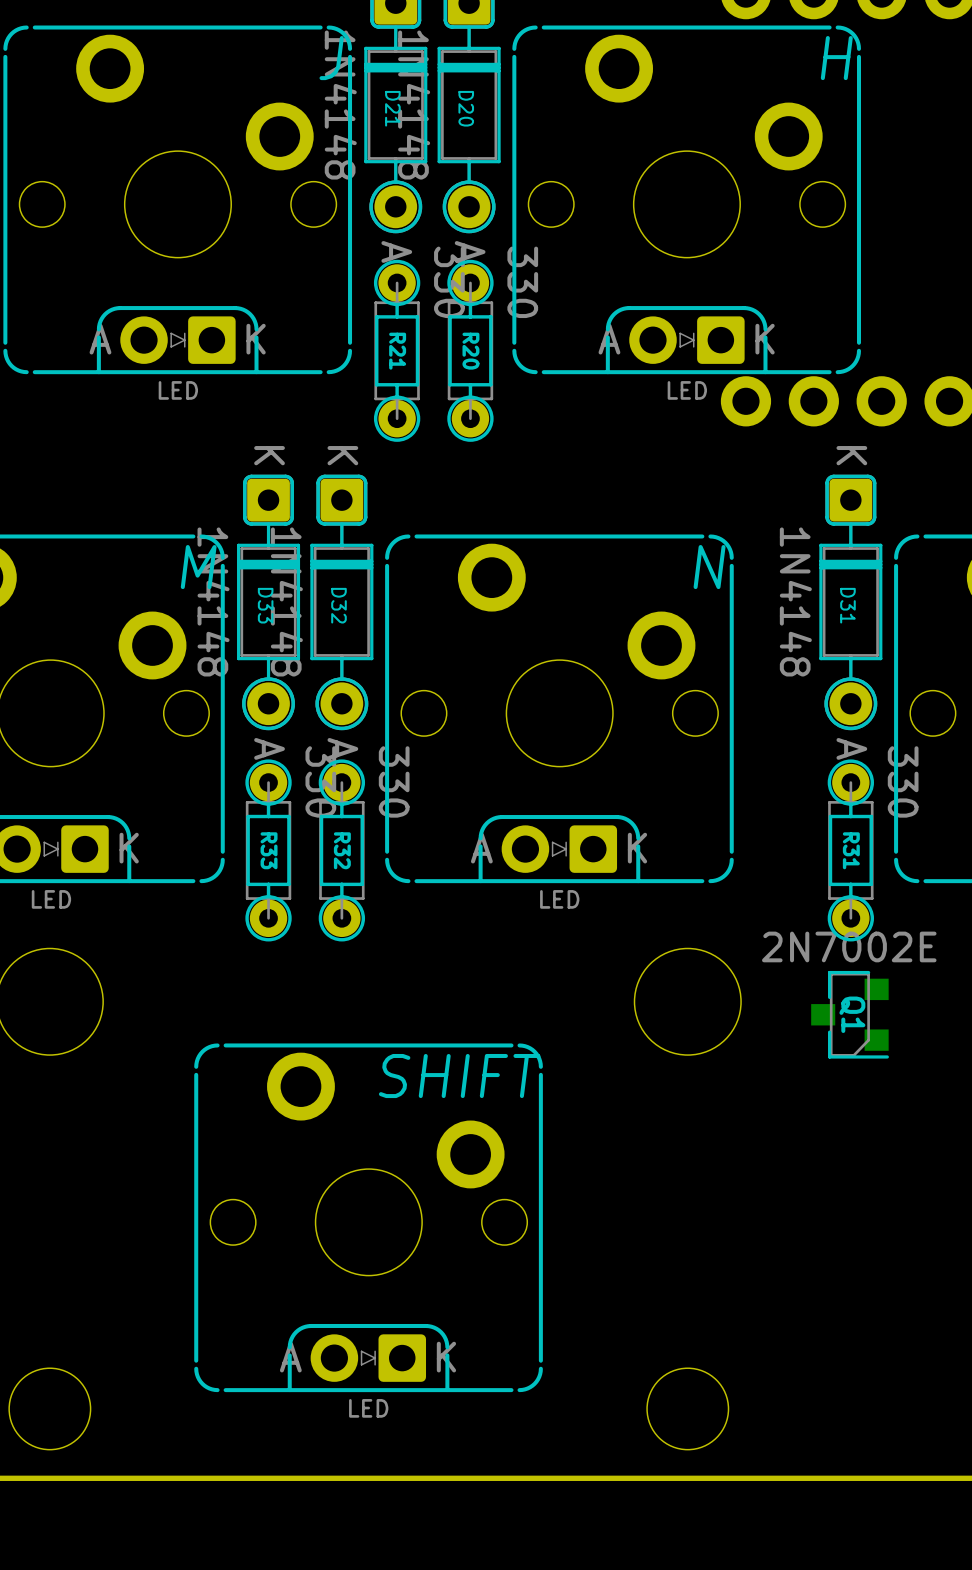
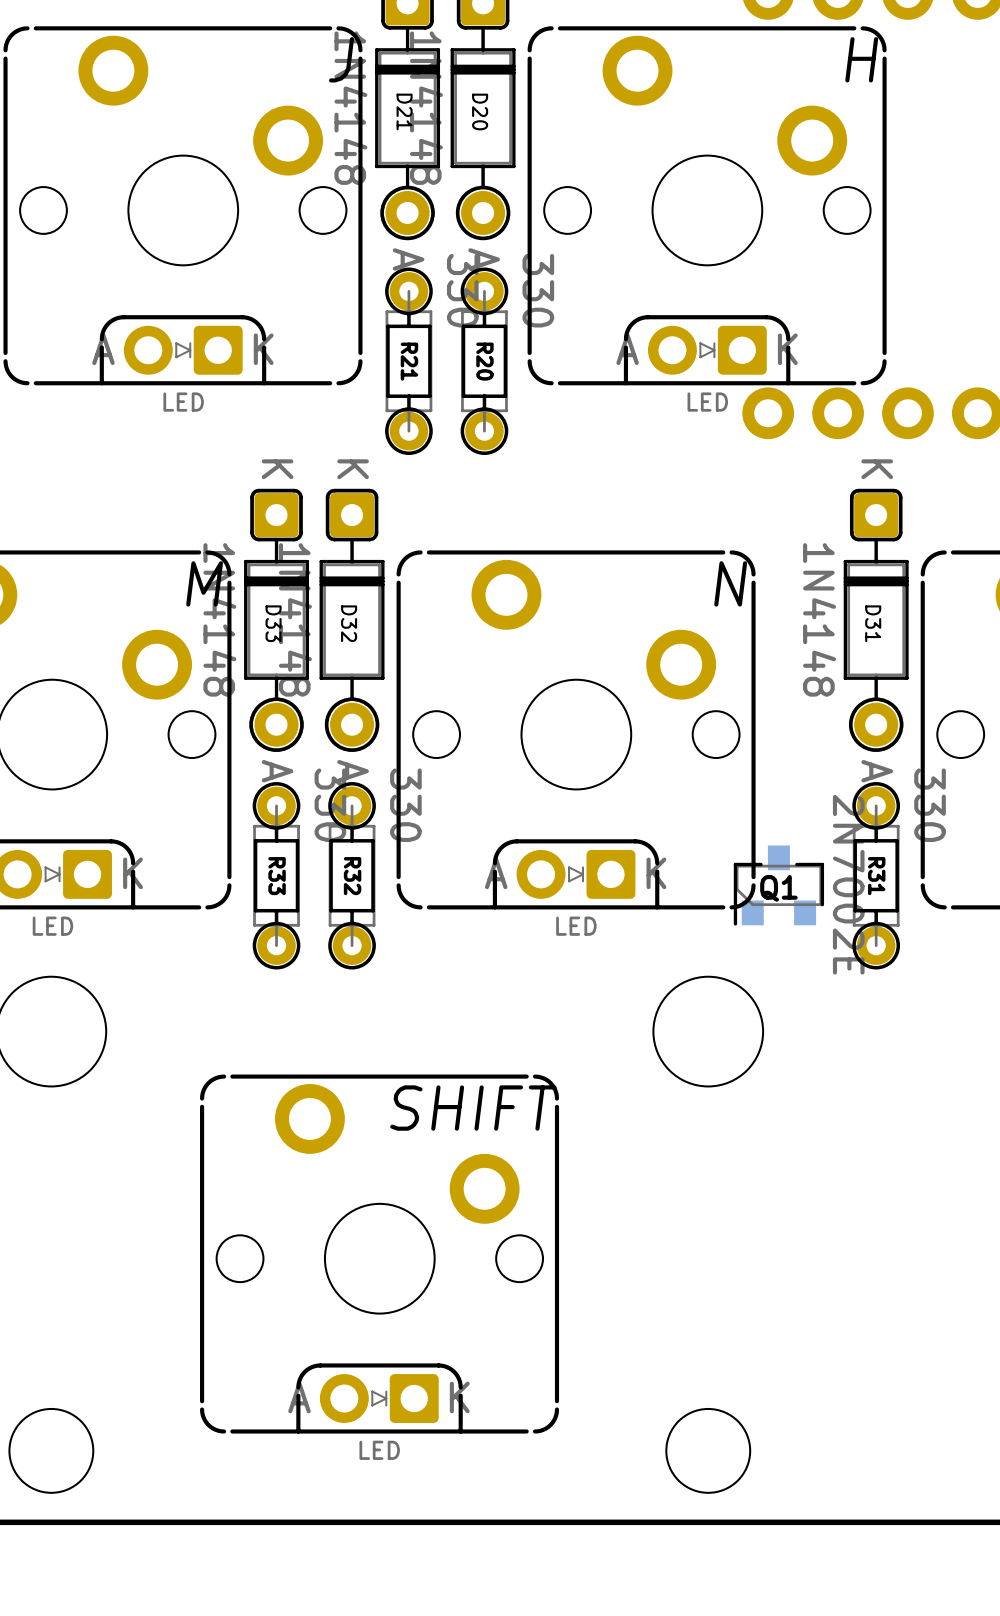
Q1 rotation: 0° (850, 1014) -> 90° clockwise (778, 885)
Q1 position: (850, 1014) -> (778, 885)

